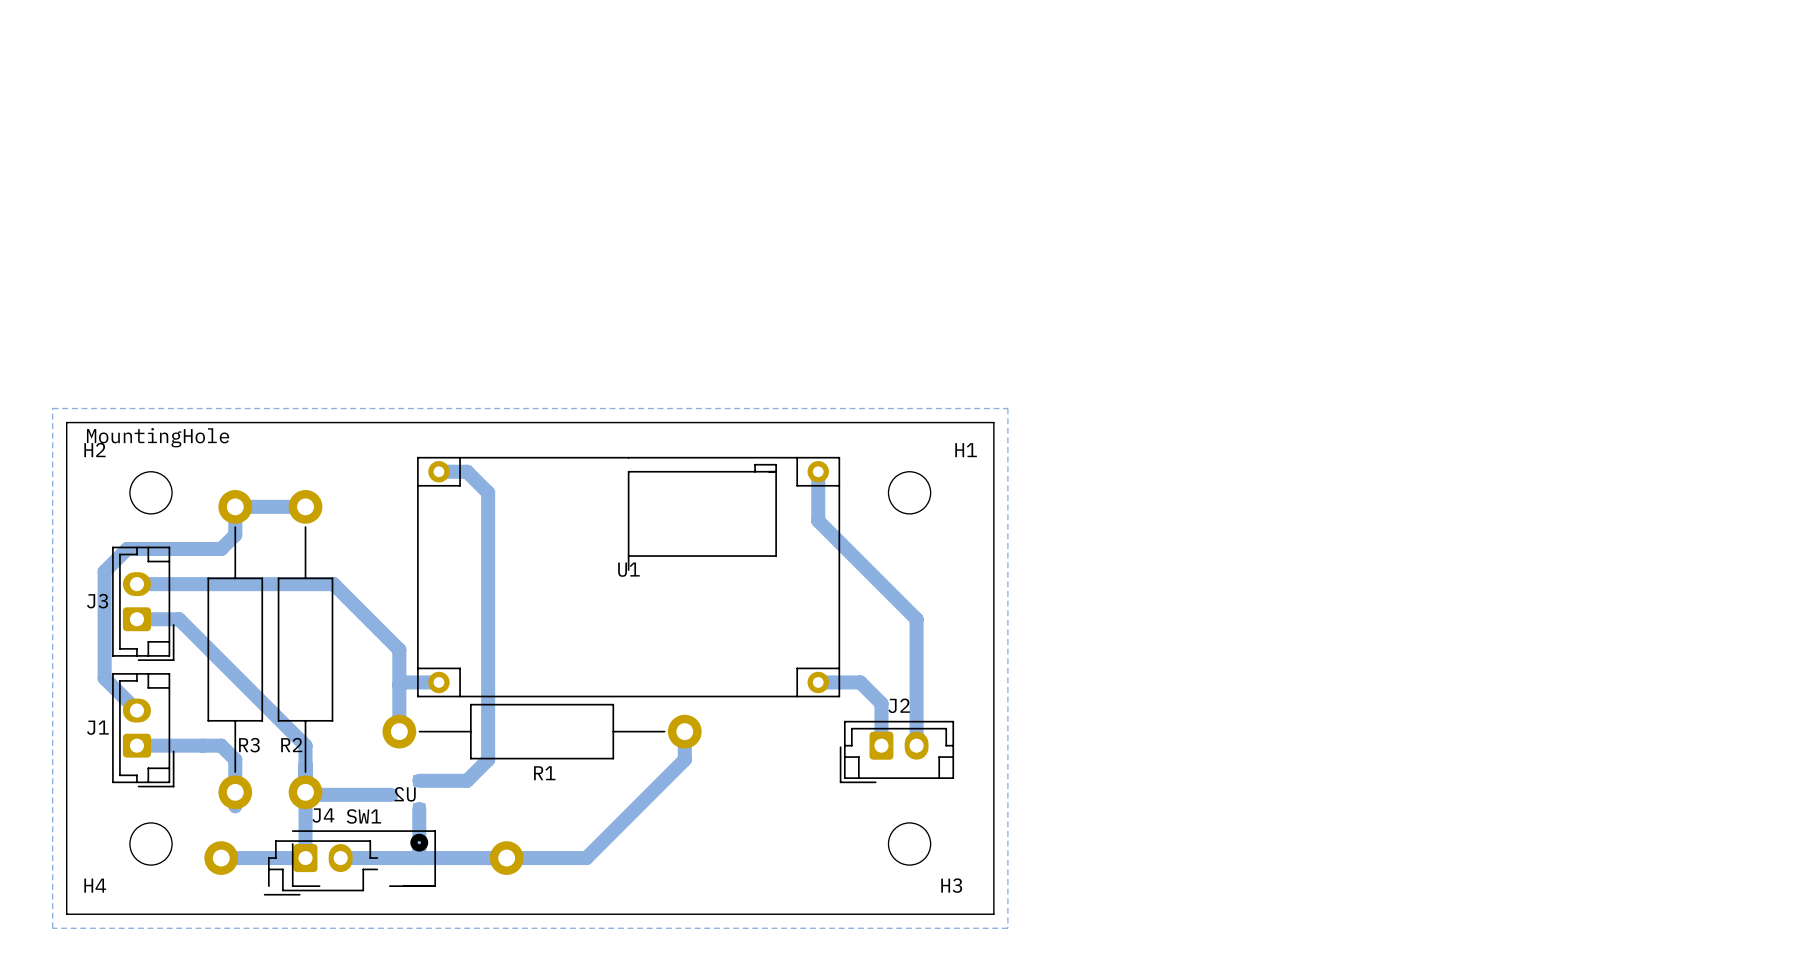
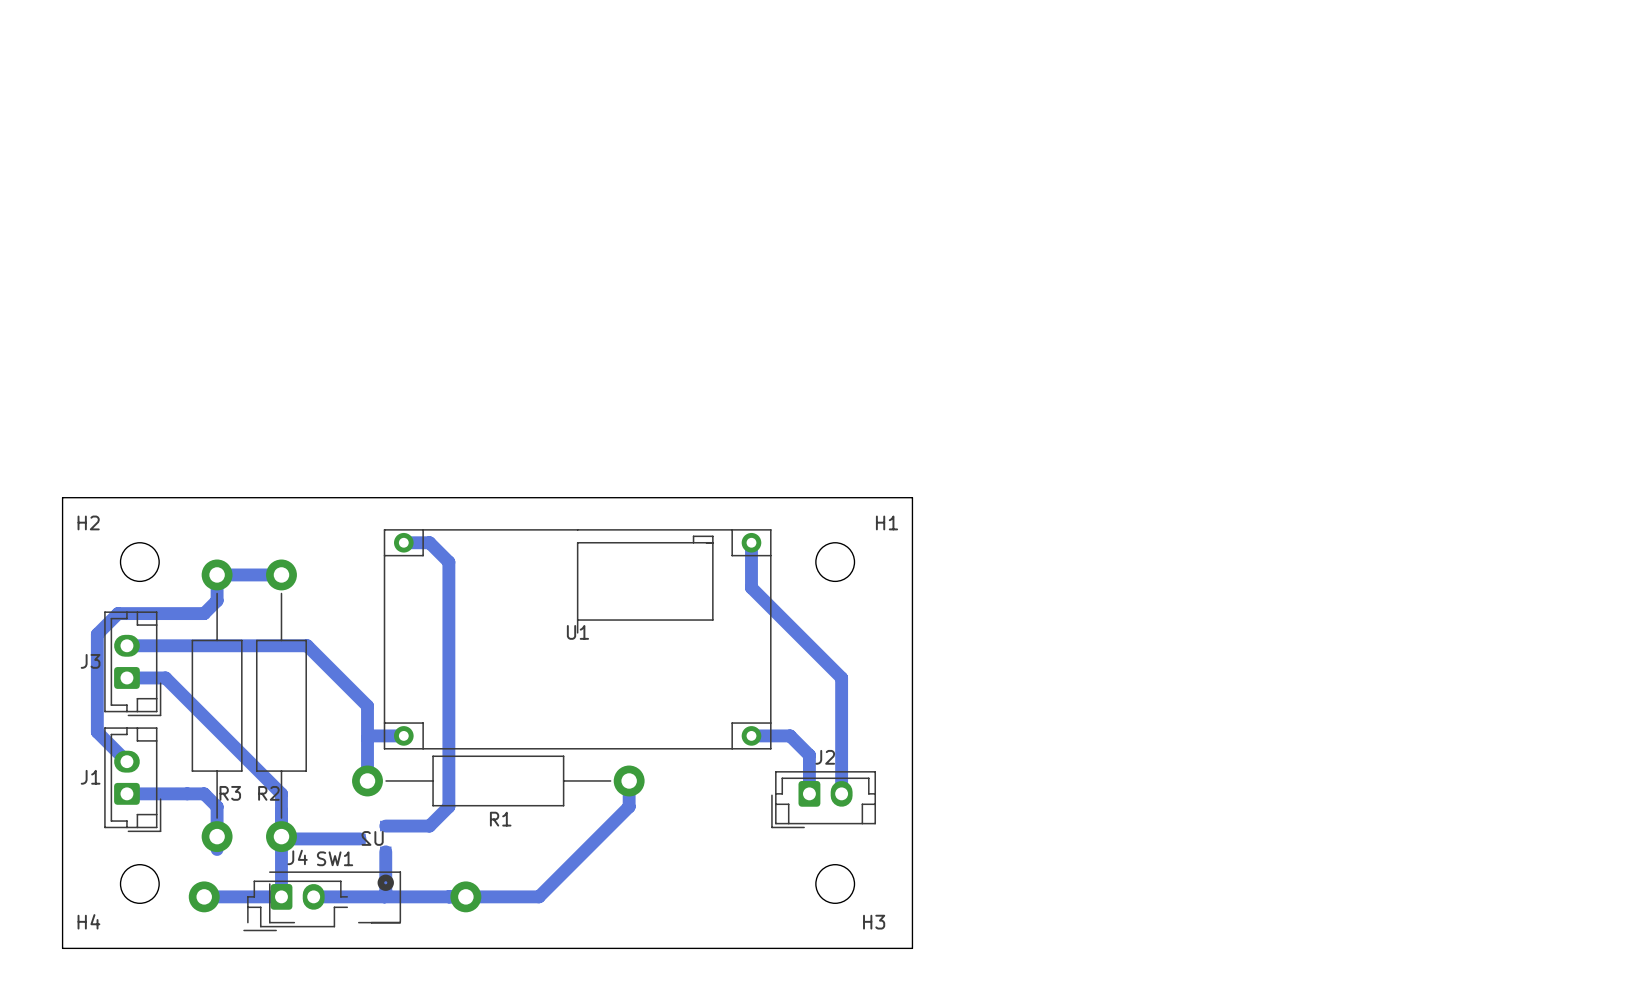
bottom zone outline: (52, 408) (52, 928) (1007, 928) (1007, 408) (52, 408) -> none
H2 value: MountingHole (158, 437) -> none

